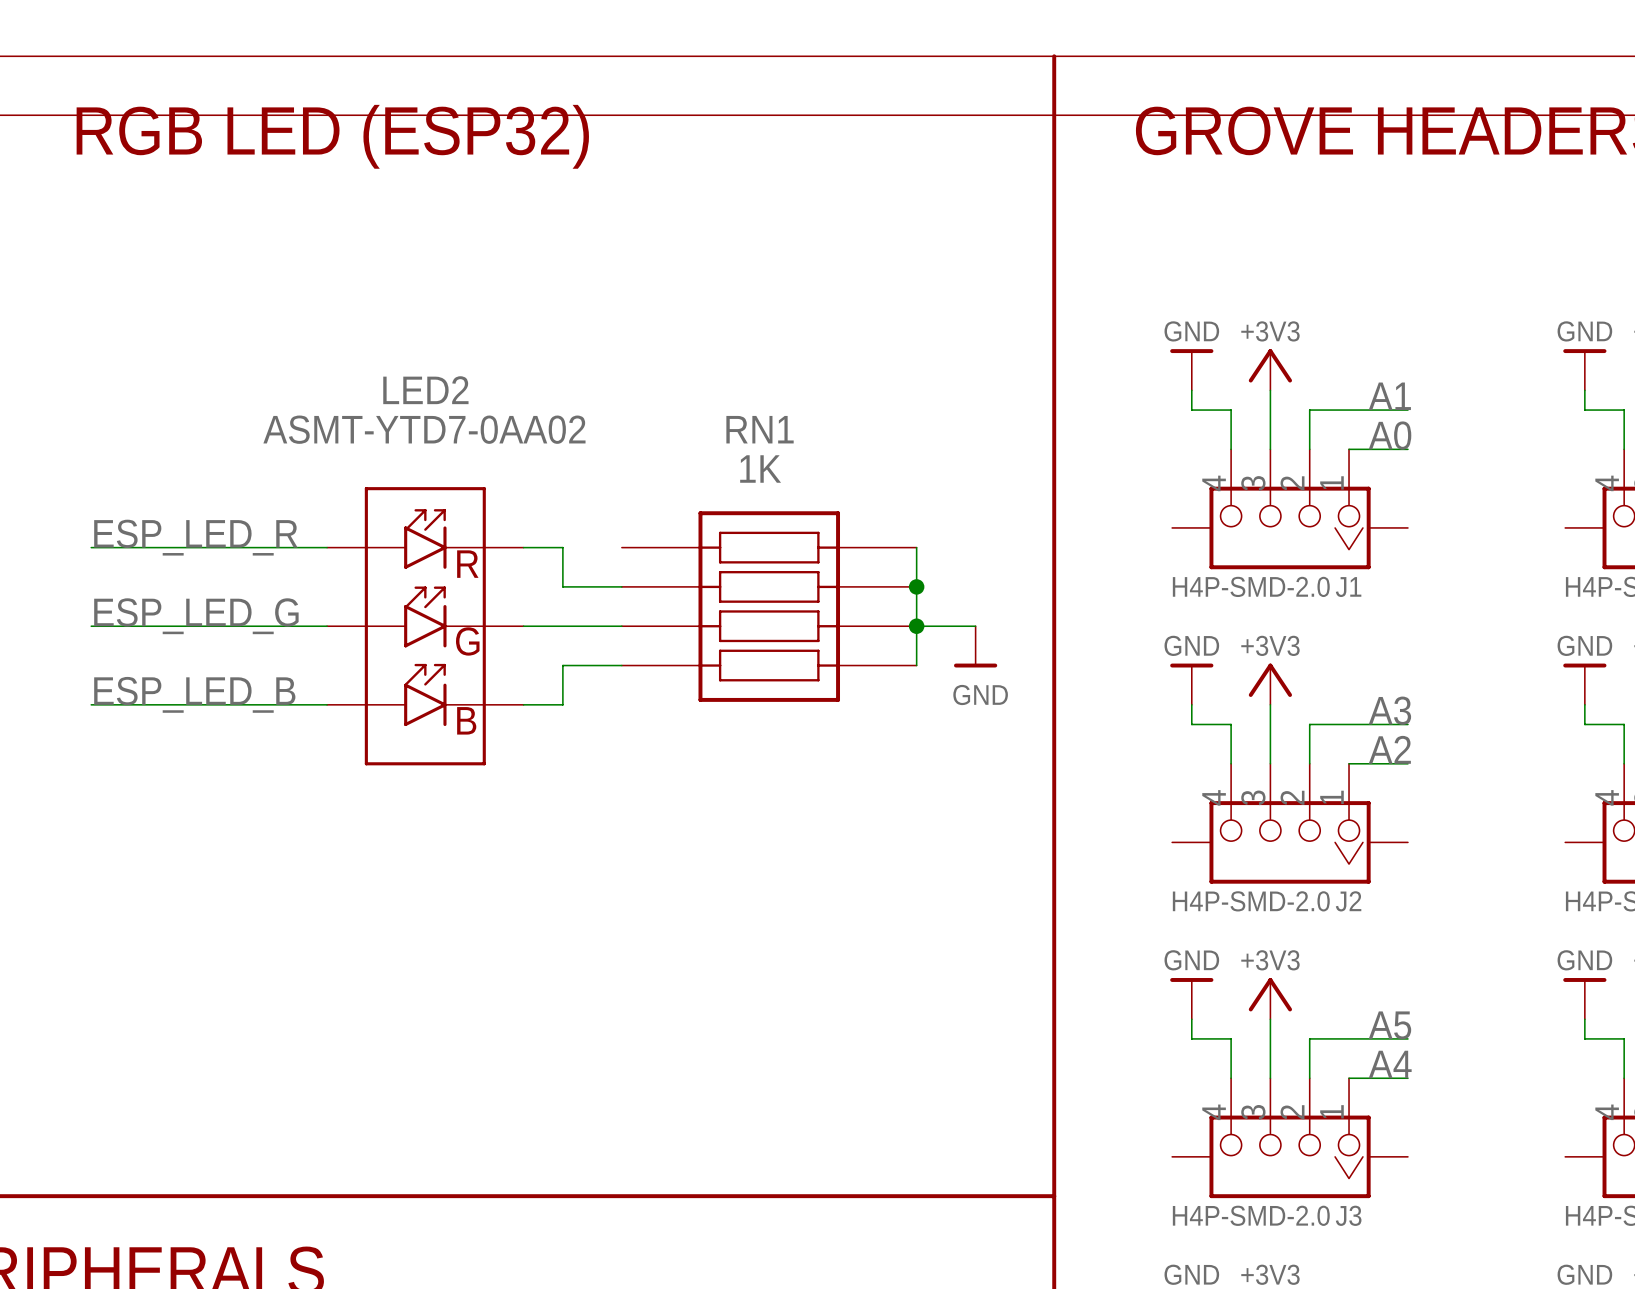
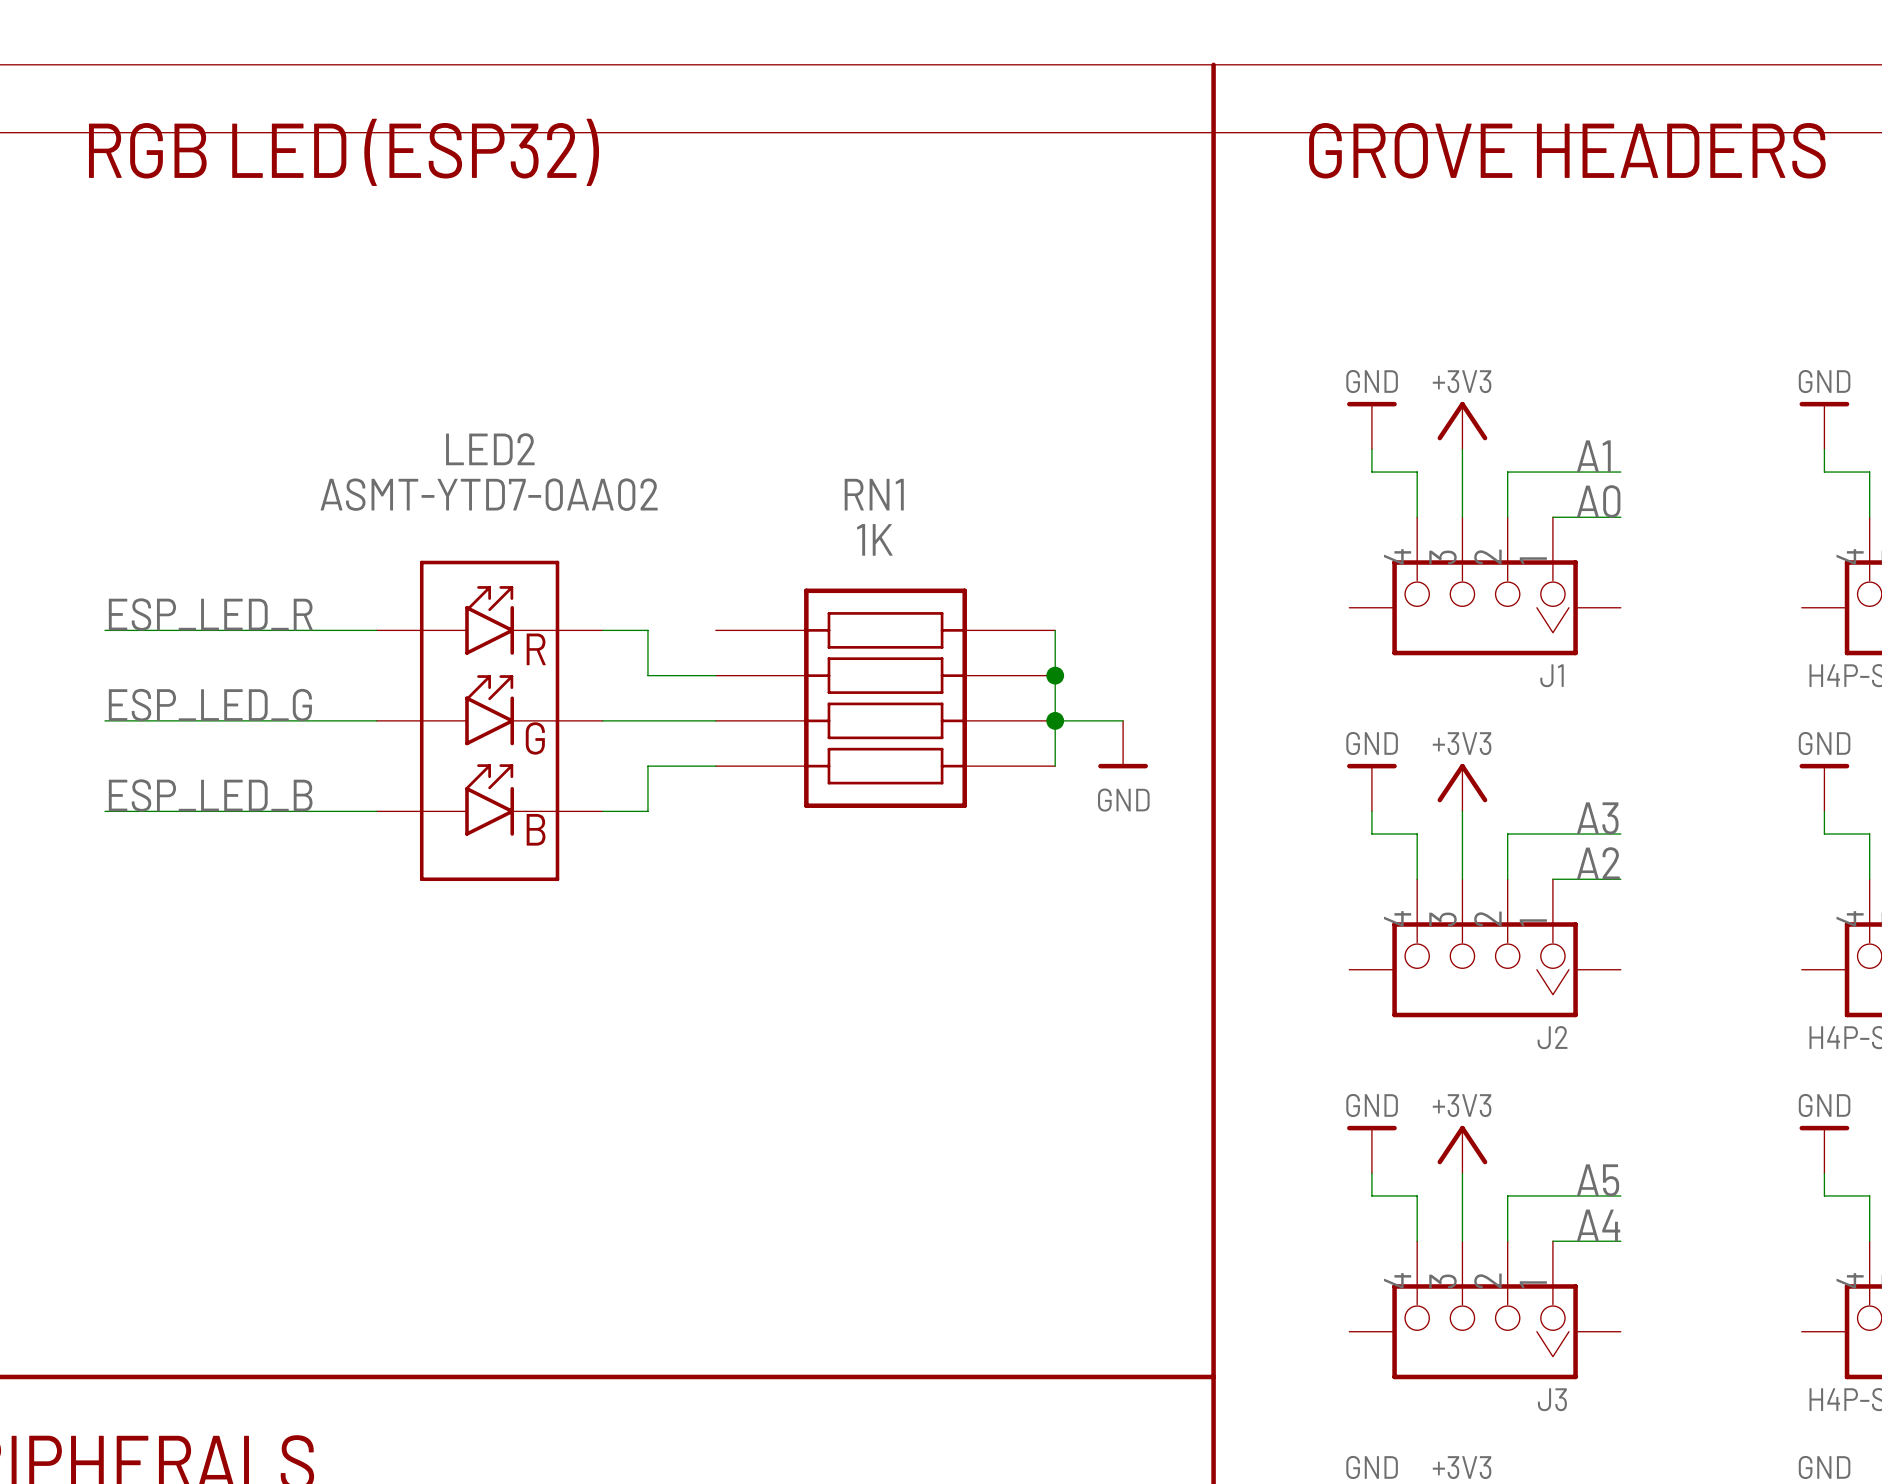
J1 value: H4P-SMD-2.0 (1251, 586) -> none
J2 value: H4P-SMD-2.0 (1251, 901) -> none
J3 value: H4P-SMD-2.0 (1251, 1215) -> none

